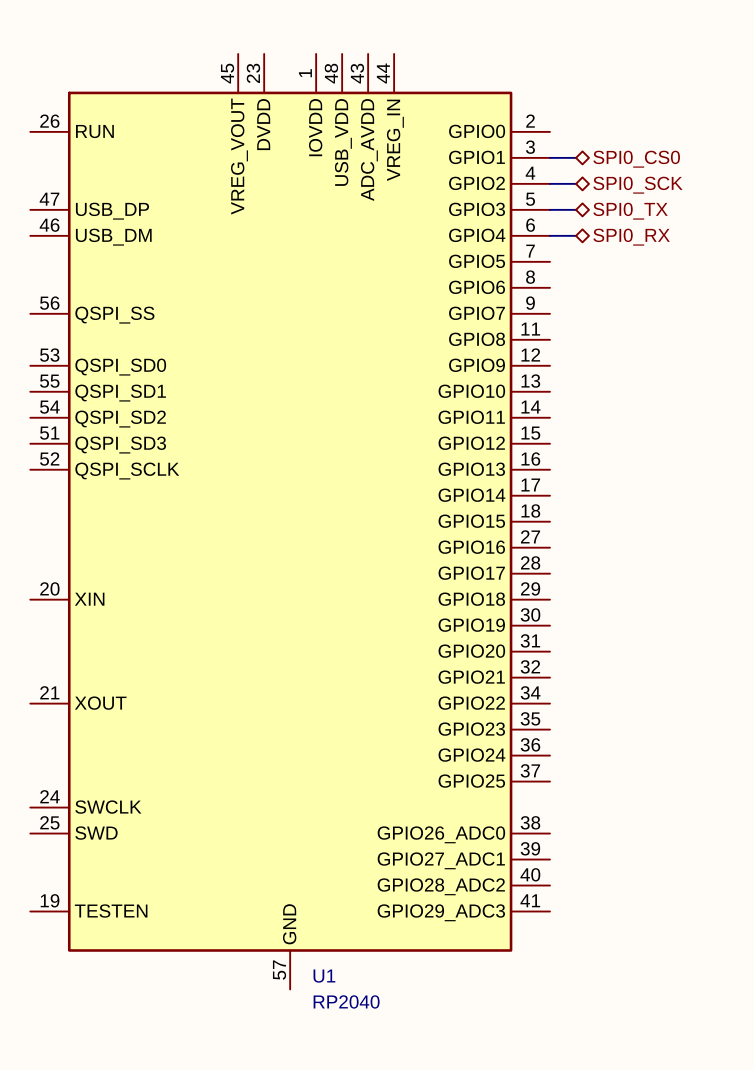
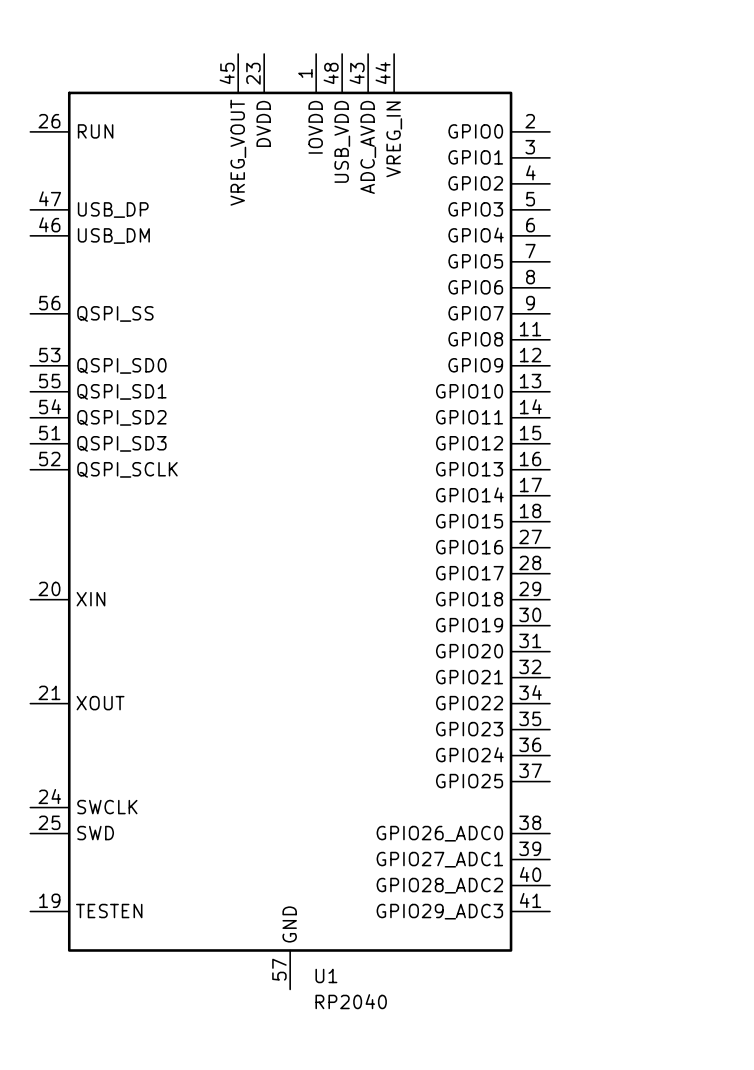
wire: (550, 157) (576, 157) -> none
hierarchical label: SPI0_CS0 (636, 159) -> none
wire: (550, 183) (576, 183) -> none
hierarchical label: SPI0_SCK (637, 185) -> none
wire: (550, 209) (576, 209) -> none
hierarchical label: SPI0_TX (630, 211) -> none
wire: (550, 235) (576, 235) -> none
hierarchical label: SPI0_RX (631, 237) -> none

